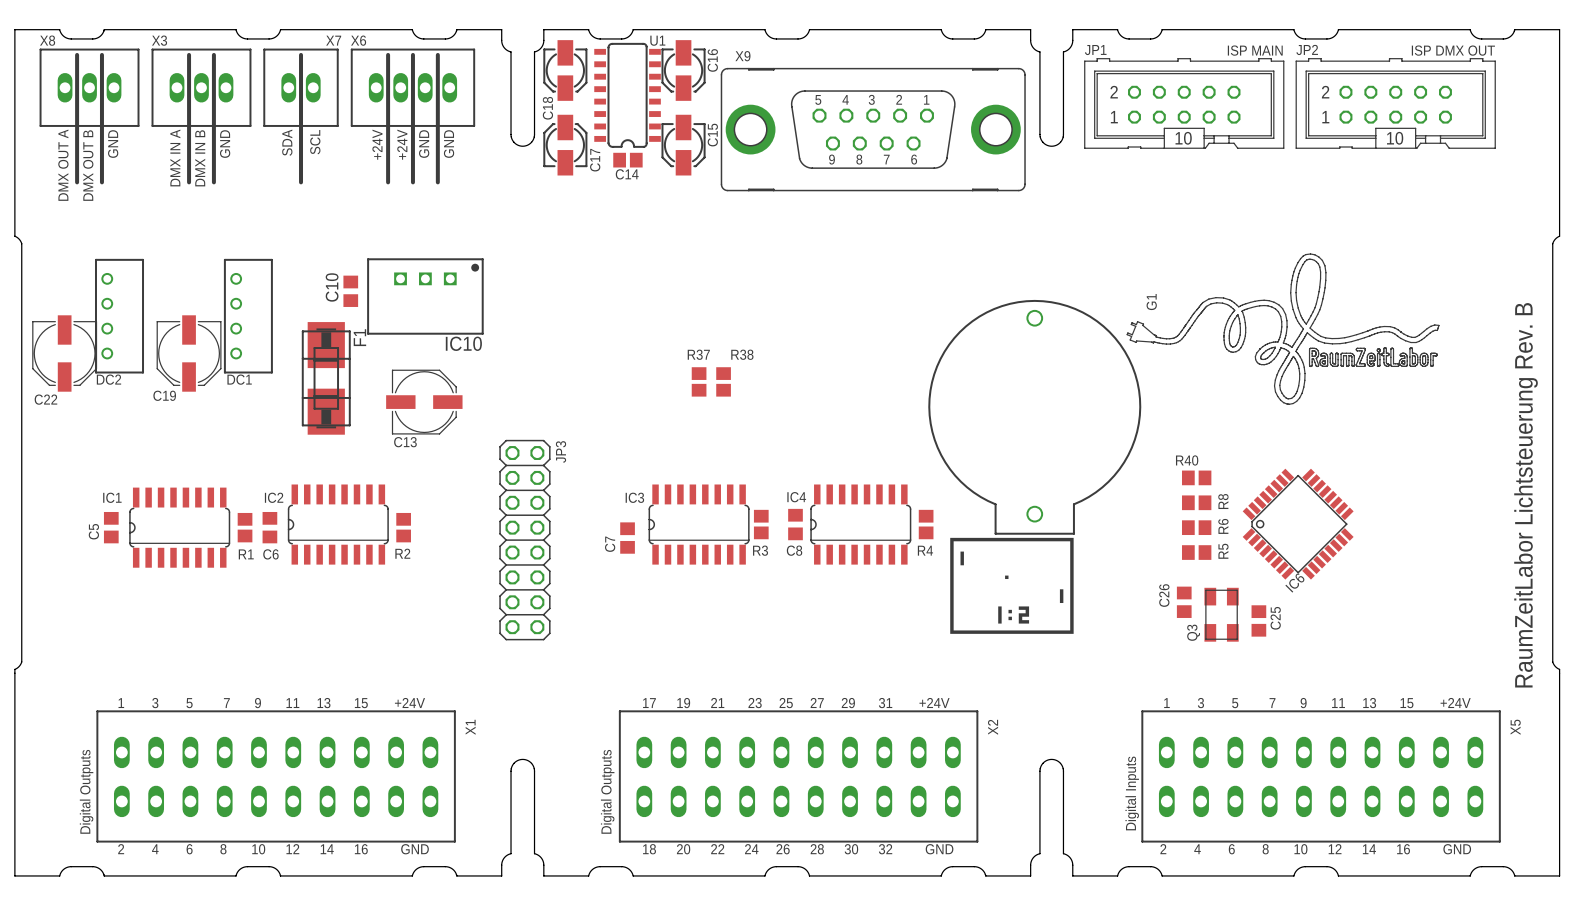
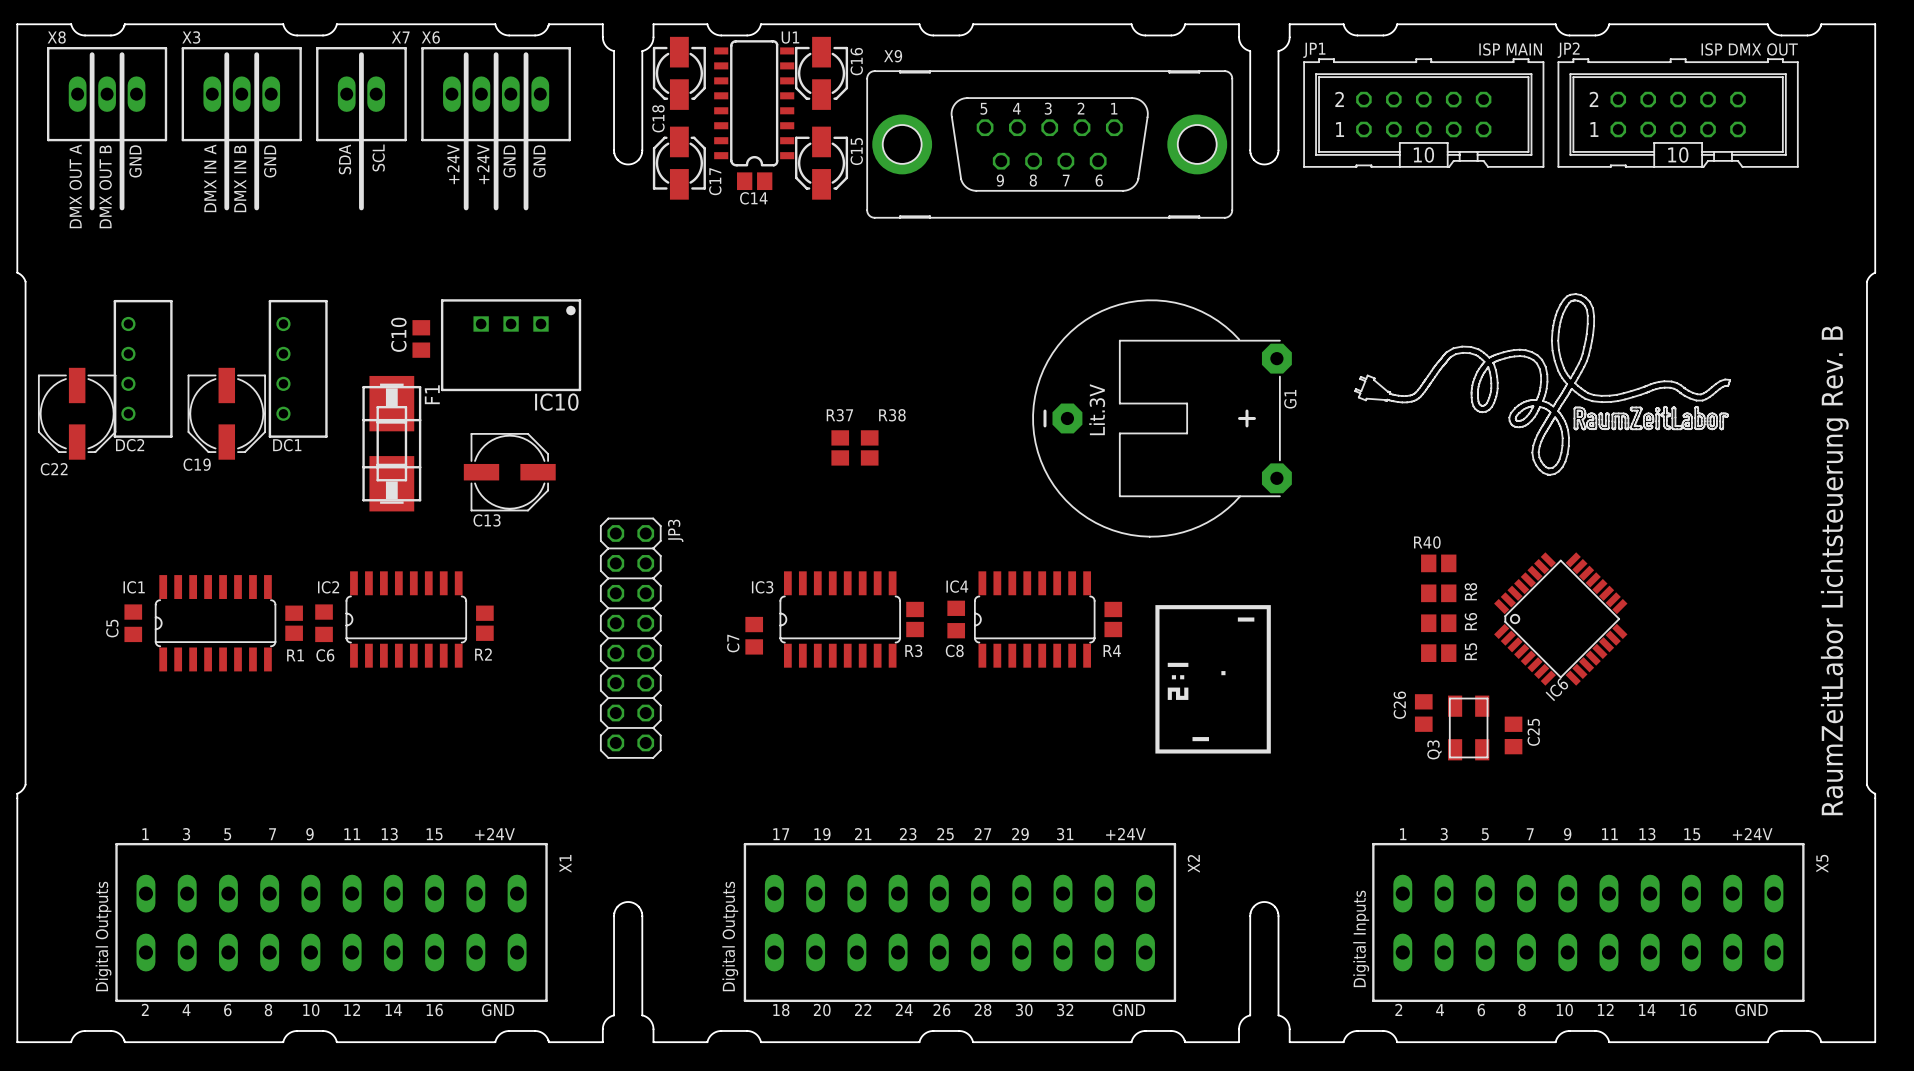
G1 footprint: [928, 299, 1142, 535] -> [1032, 299, 1292, 538]
G1 name position: G1 (1151, 302) -> G1 (1290, 399)
drawing: none -> [1155, 605, 1271, 754]
drawing: [950, 537, 1074, 634] -> none
drawing: none -> [1221, 671, 1226, 676]
drawing: [1005, 575, 1009, 580] -> none
drawing shape: [998, 606, 1002, 624] -> [1192, 737, 1209, 742]
drawing: [1008, 606, 1030, 624] -> none
drawing shape: [953, 630, 1071, 634] -> [1155, 749, 1267, 754]

